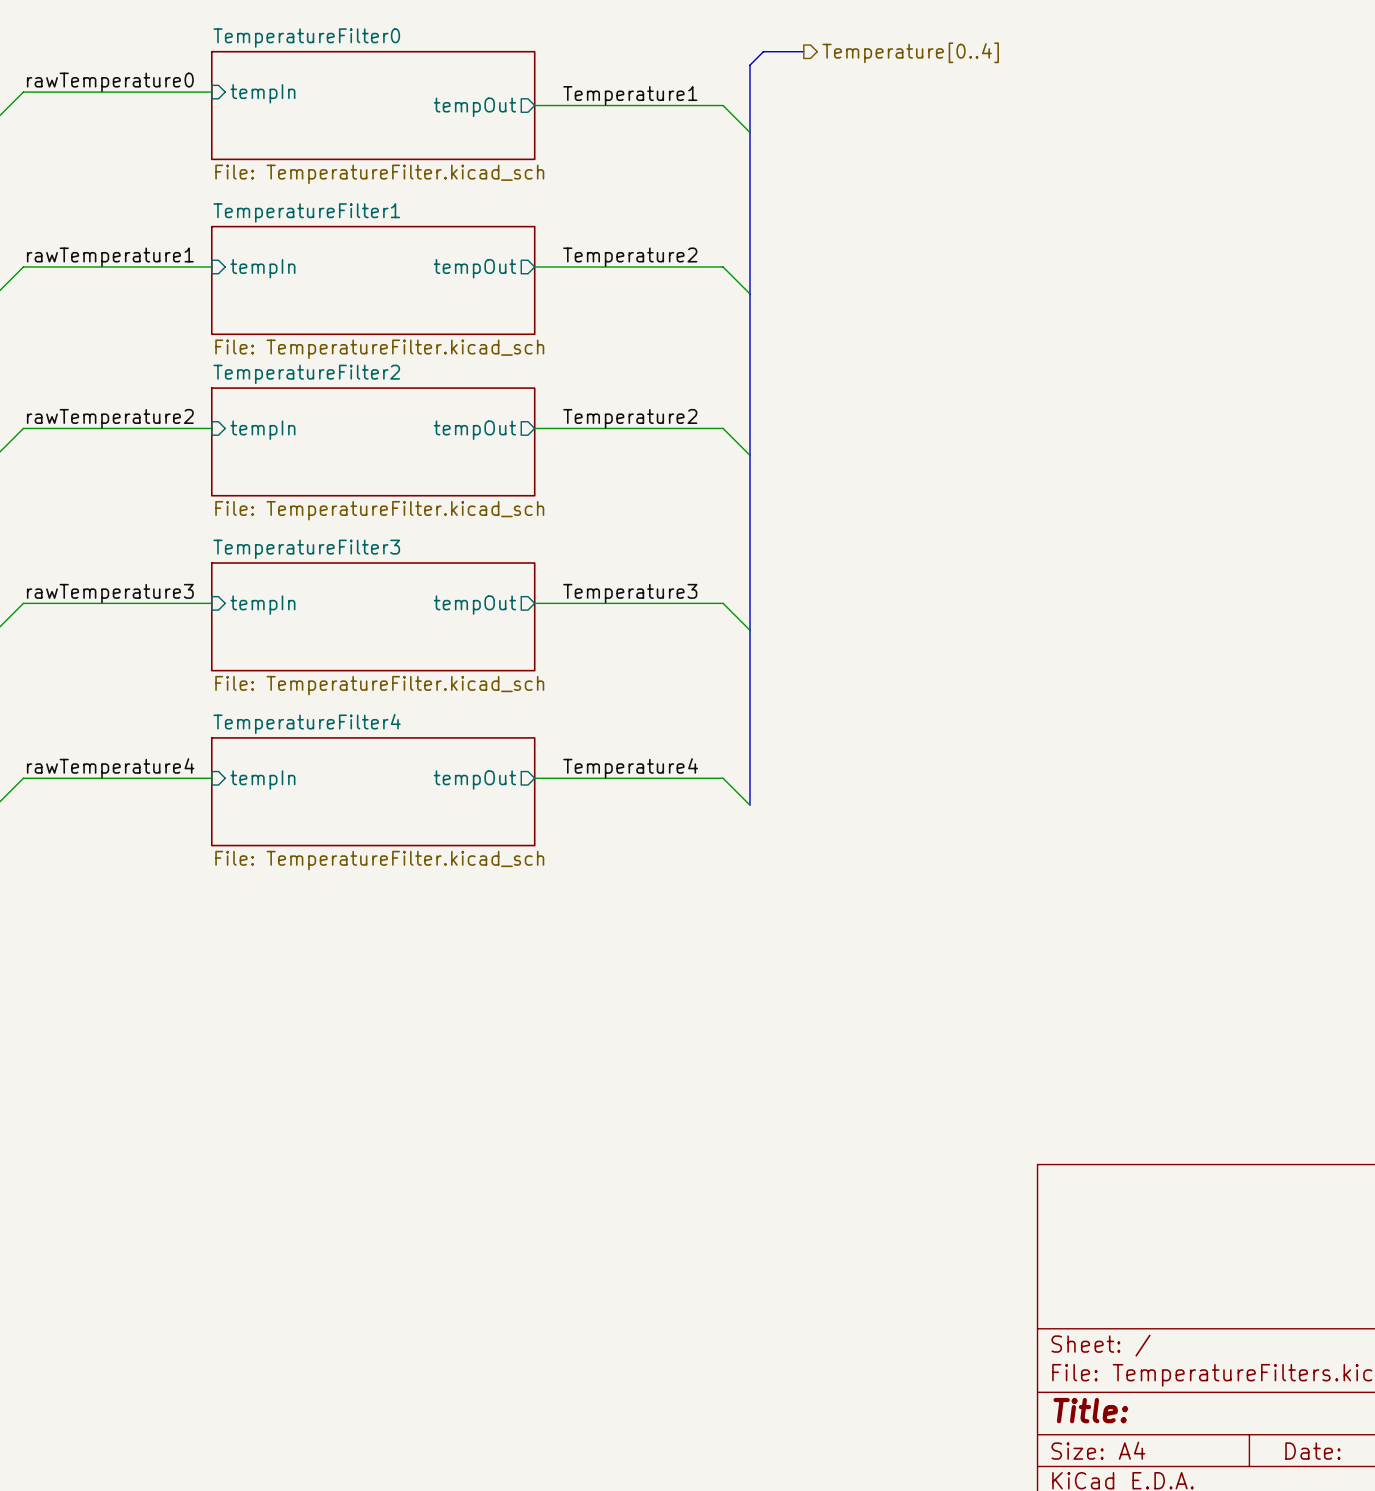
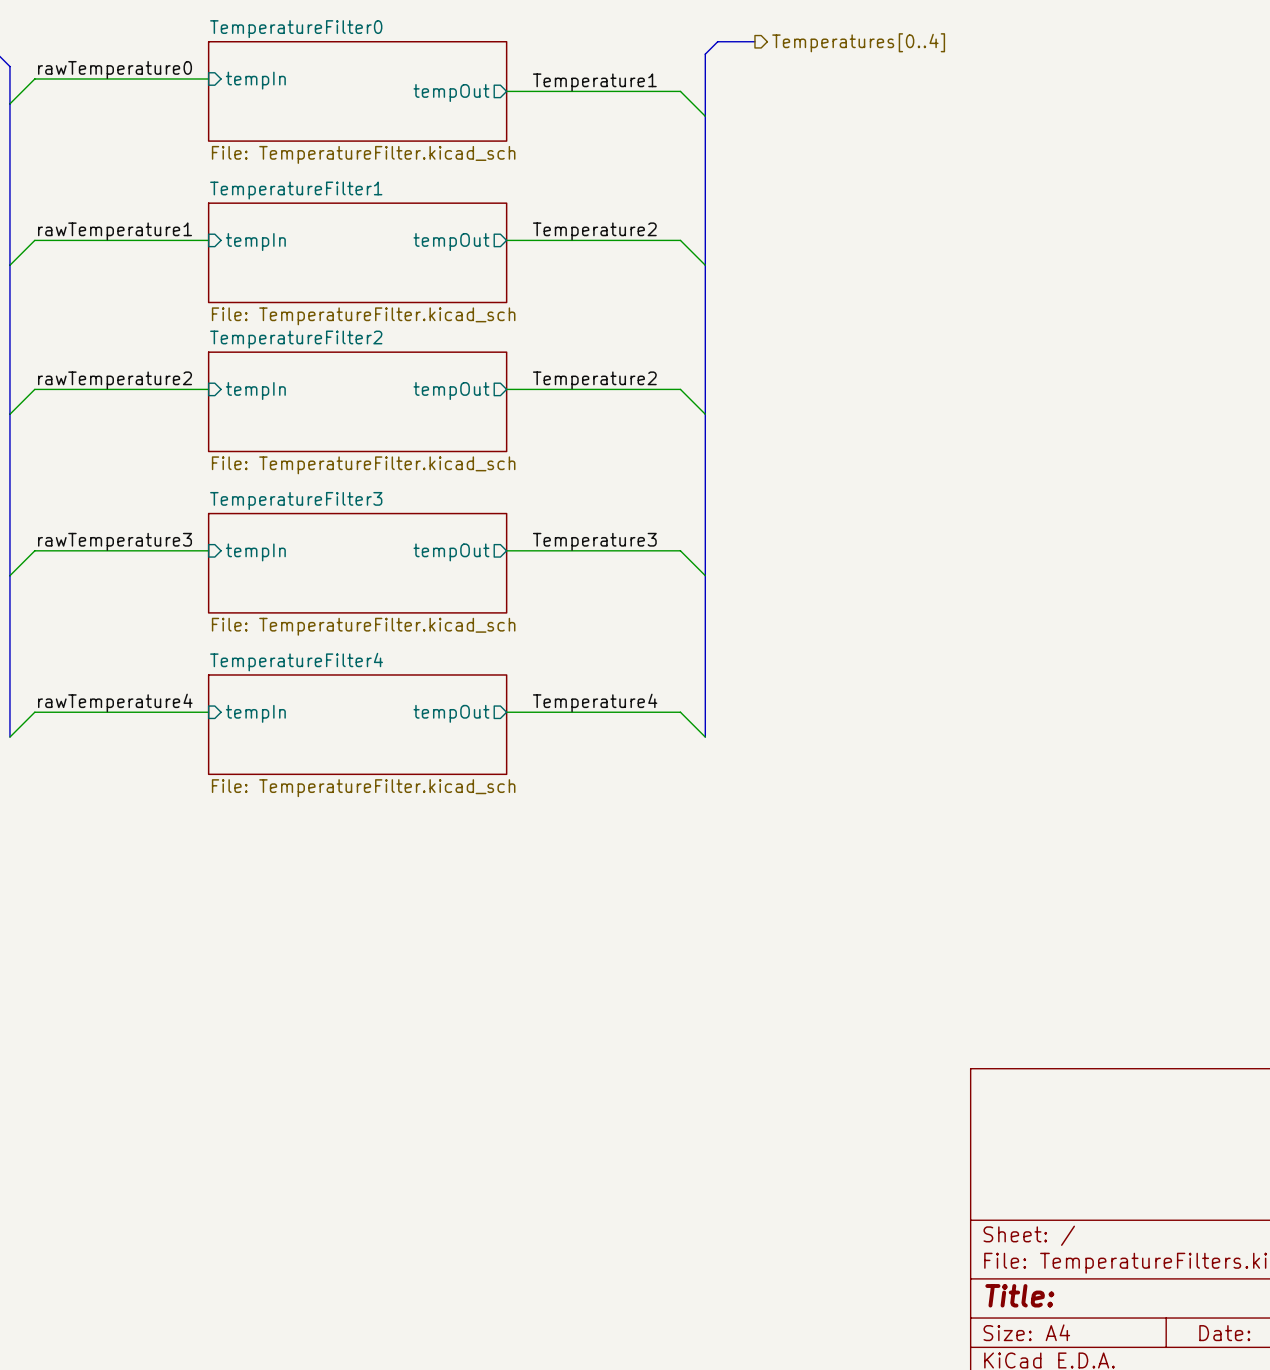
hierarchical label: Temperature[0..4] (910, 52) -> Temperatures[0..4] (858, 42)

